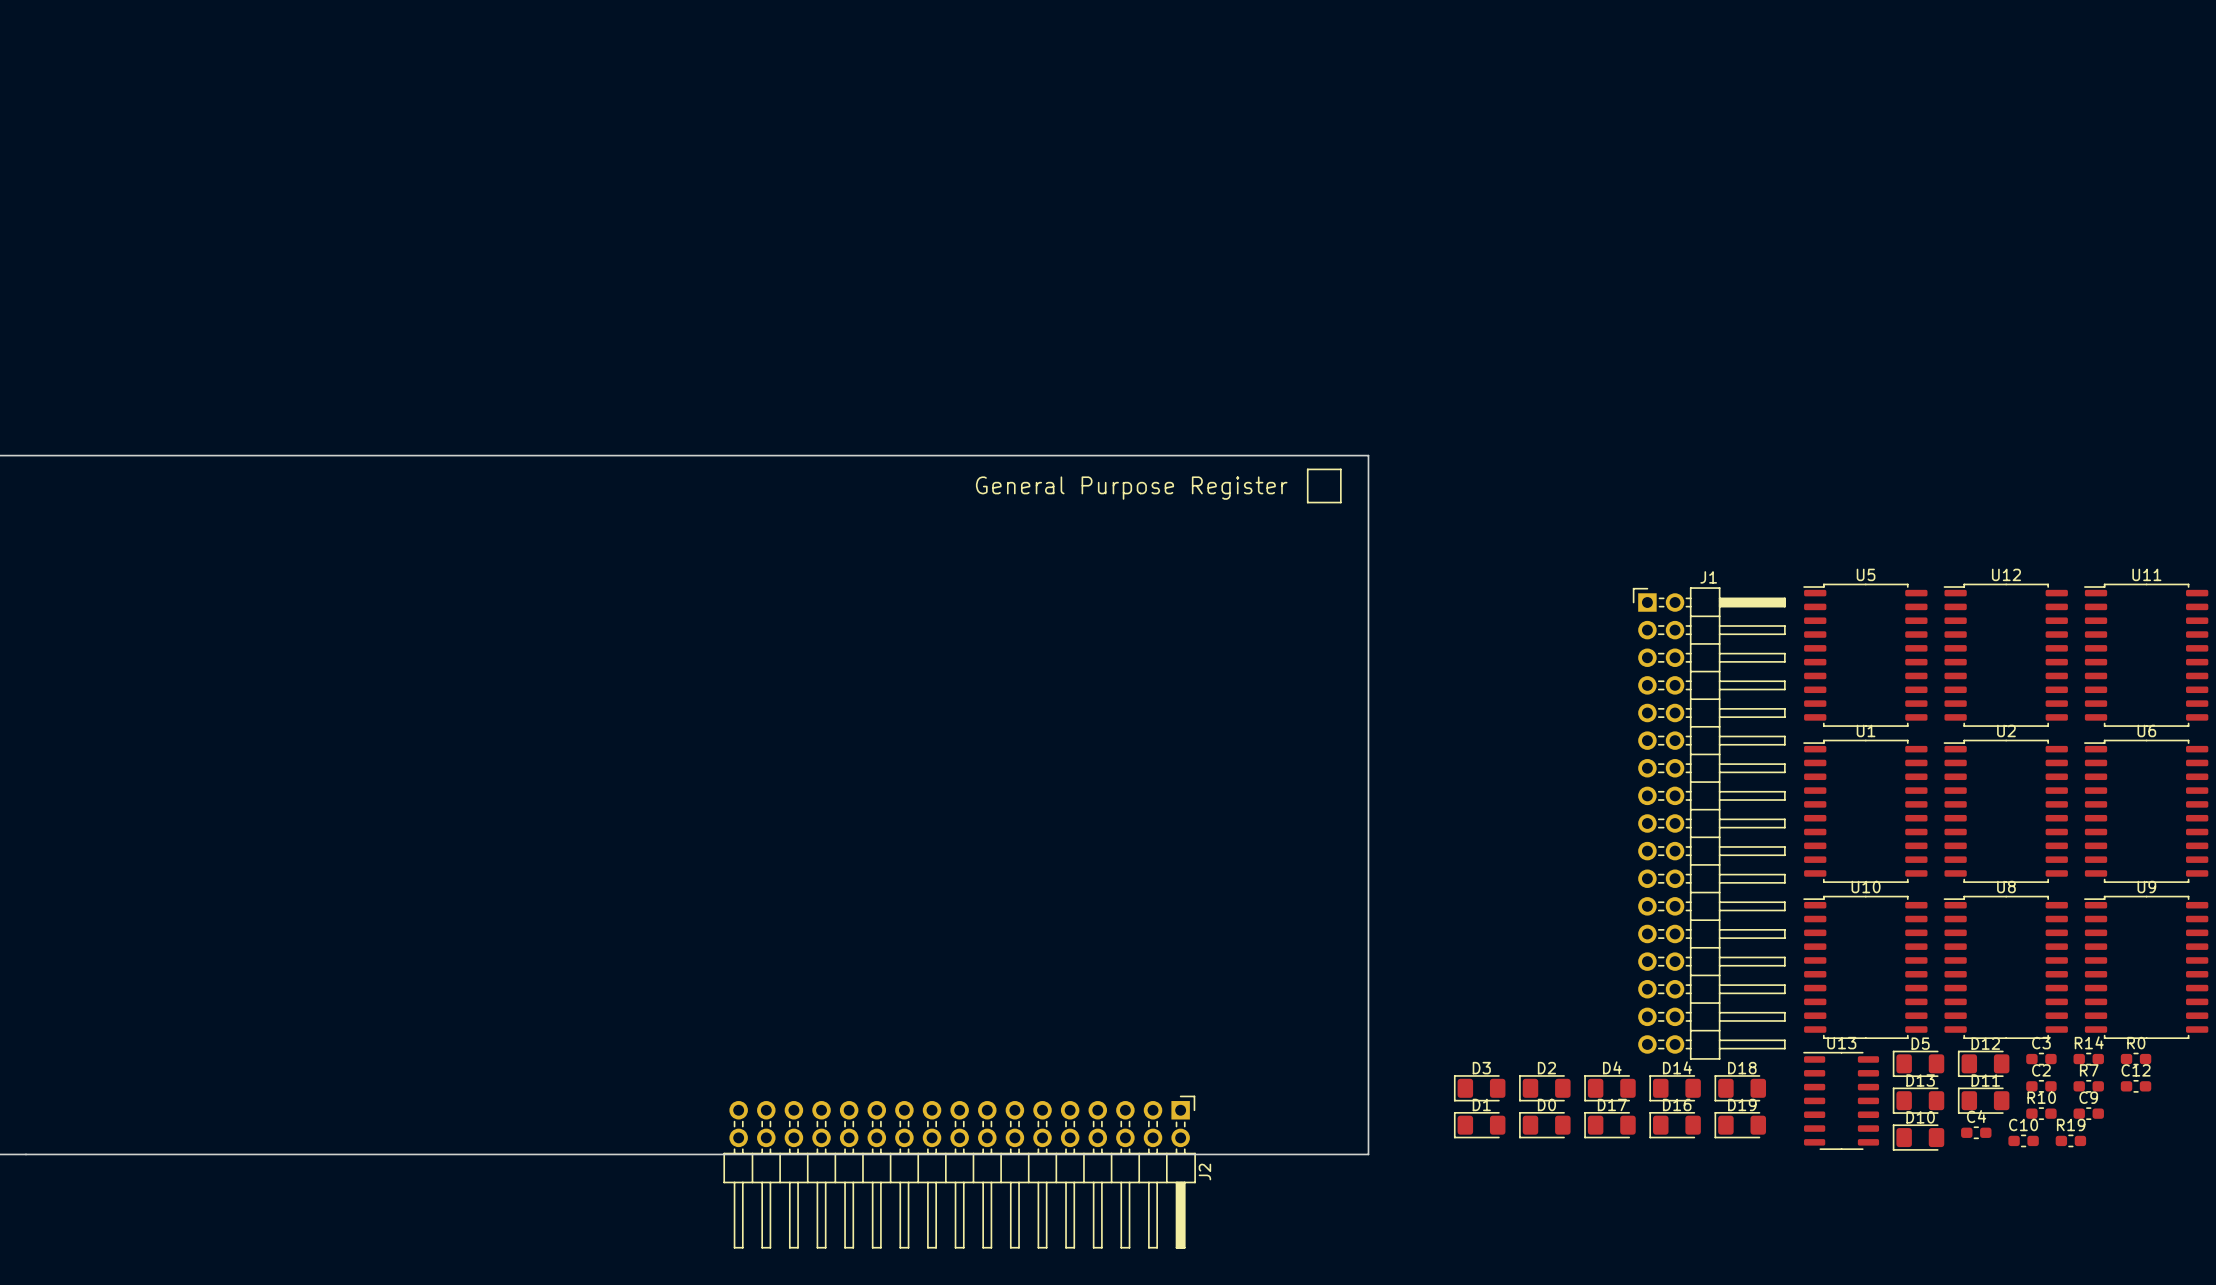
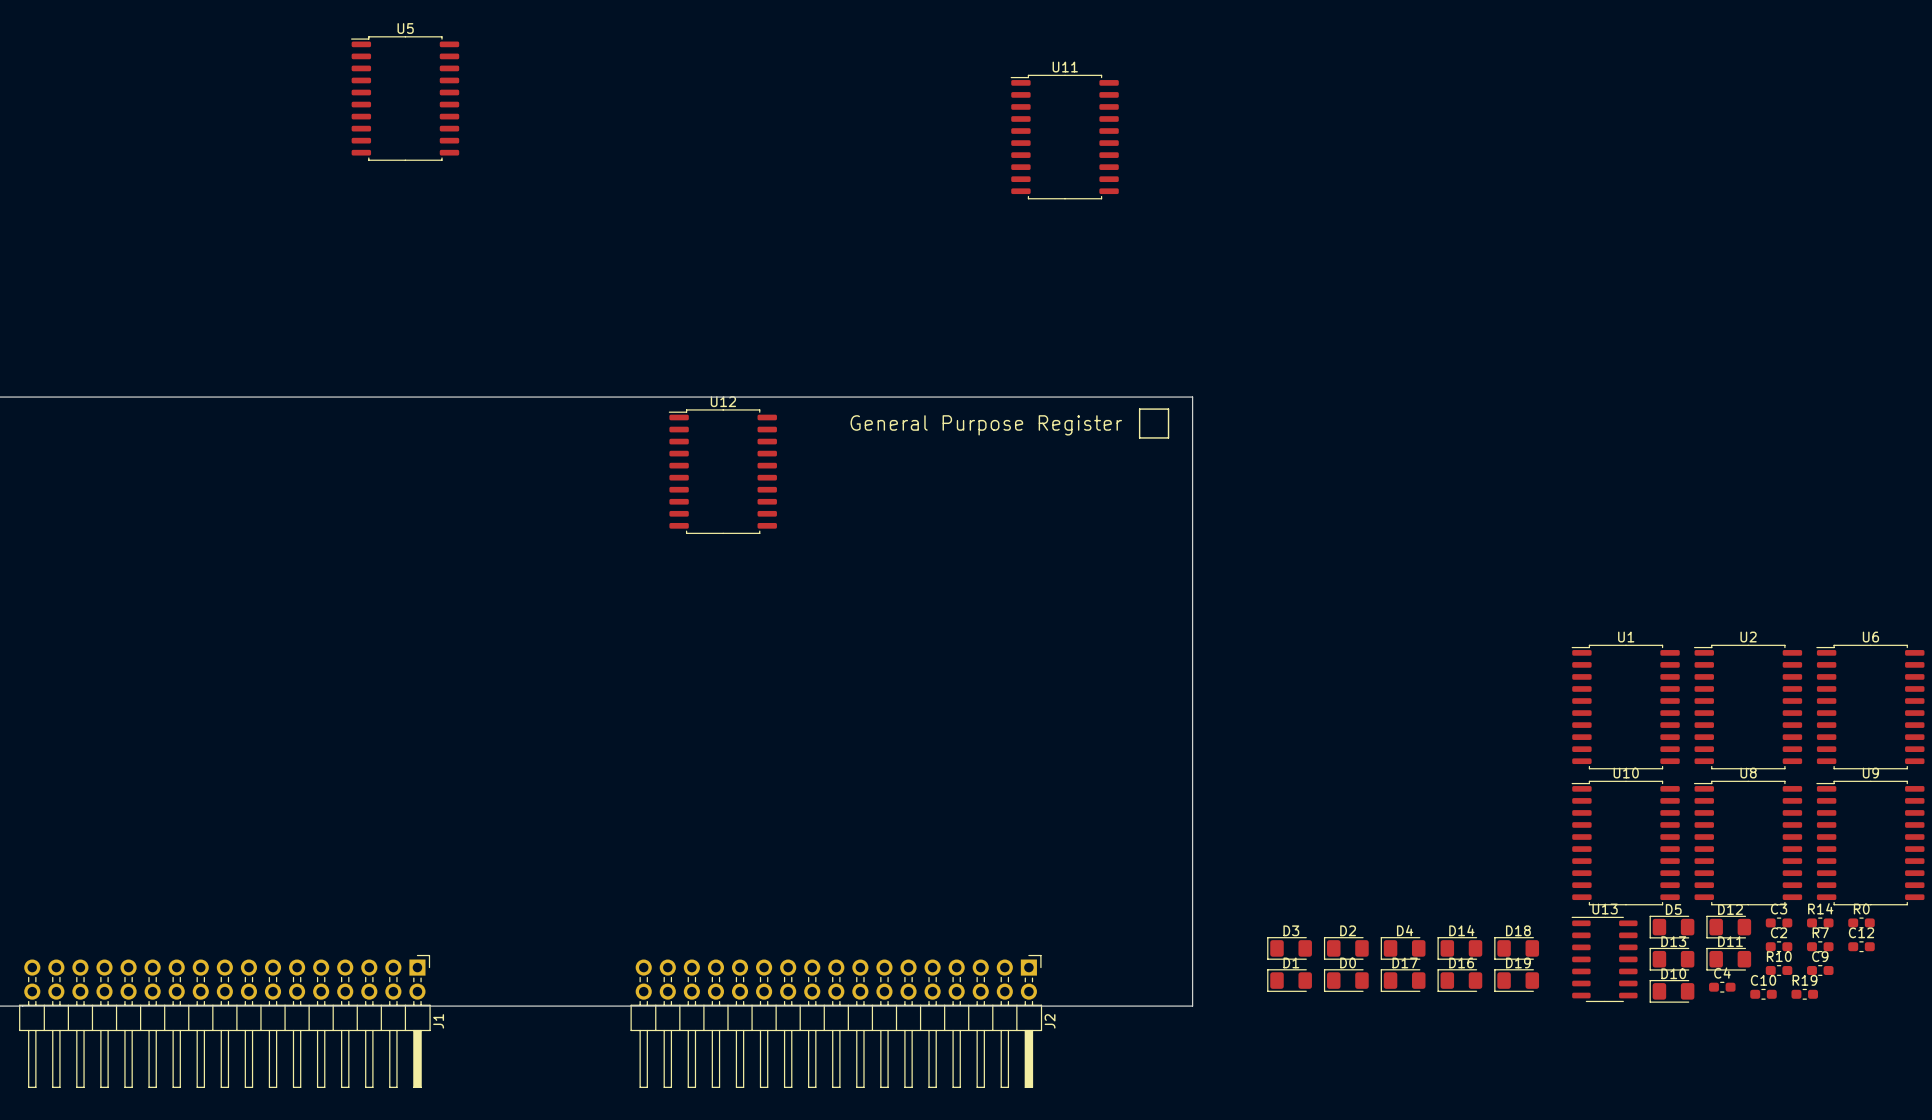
U5 position: (1865, 655) -> (405, 98)
U12 position: (2005, 655) -> (722, 471)
U11 position: (2146, 655) -> (1064, 137)
J1 rotation: 0° (1709, 823) -> 90° clockwise (224, 1021)
J1 position: (1709, 823) -> (224, 1021)

